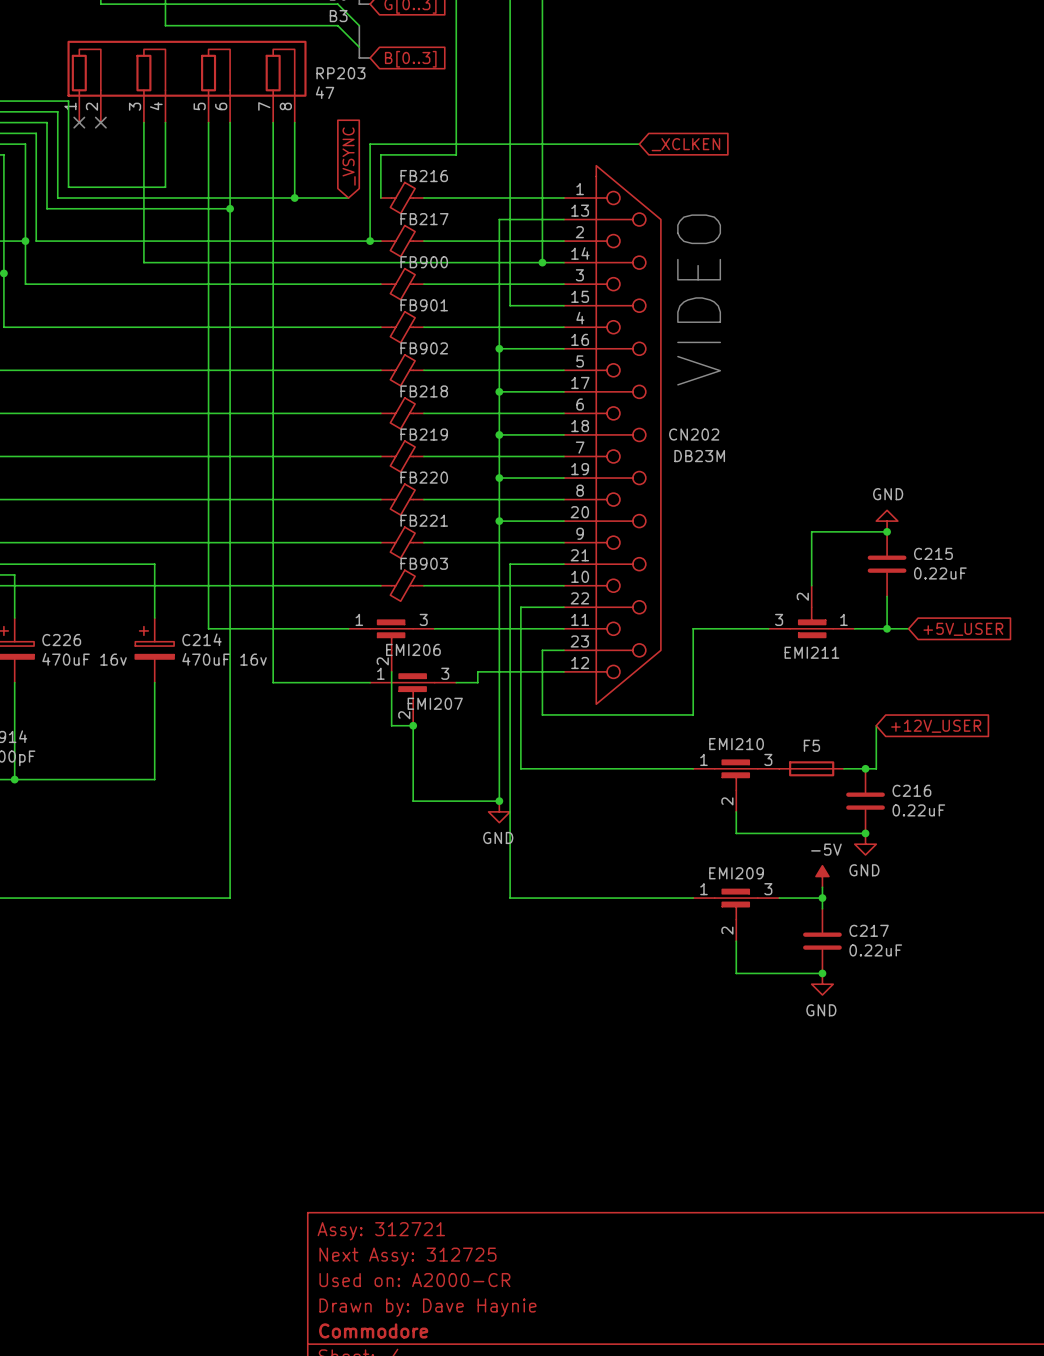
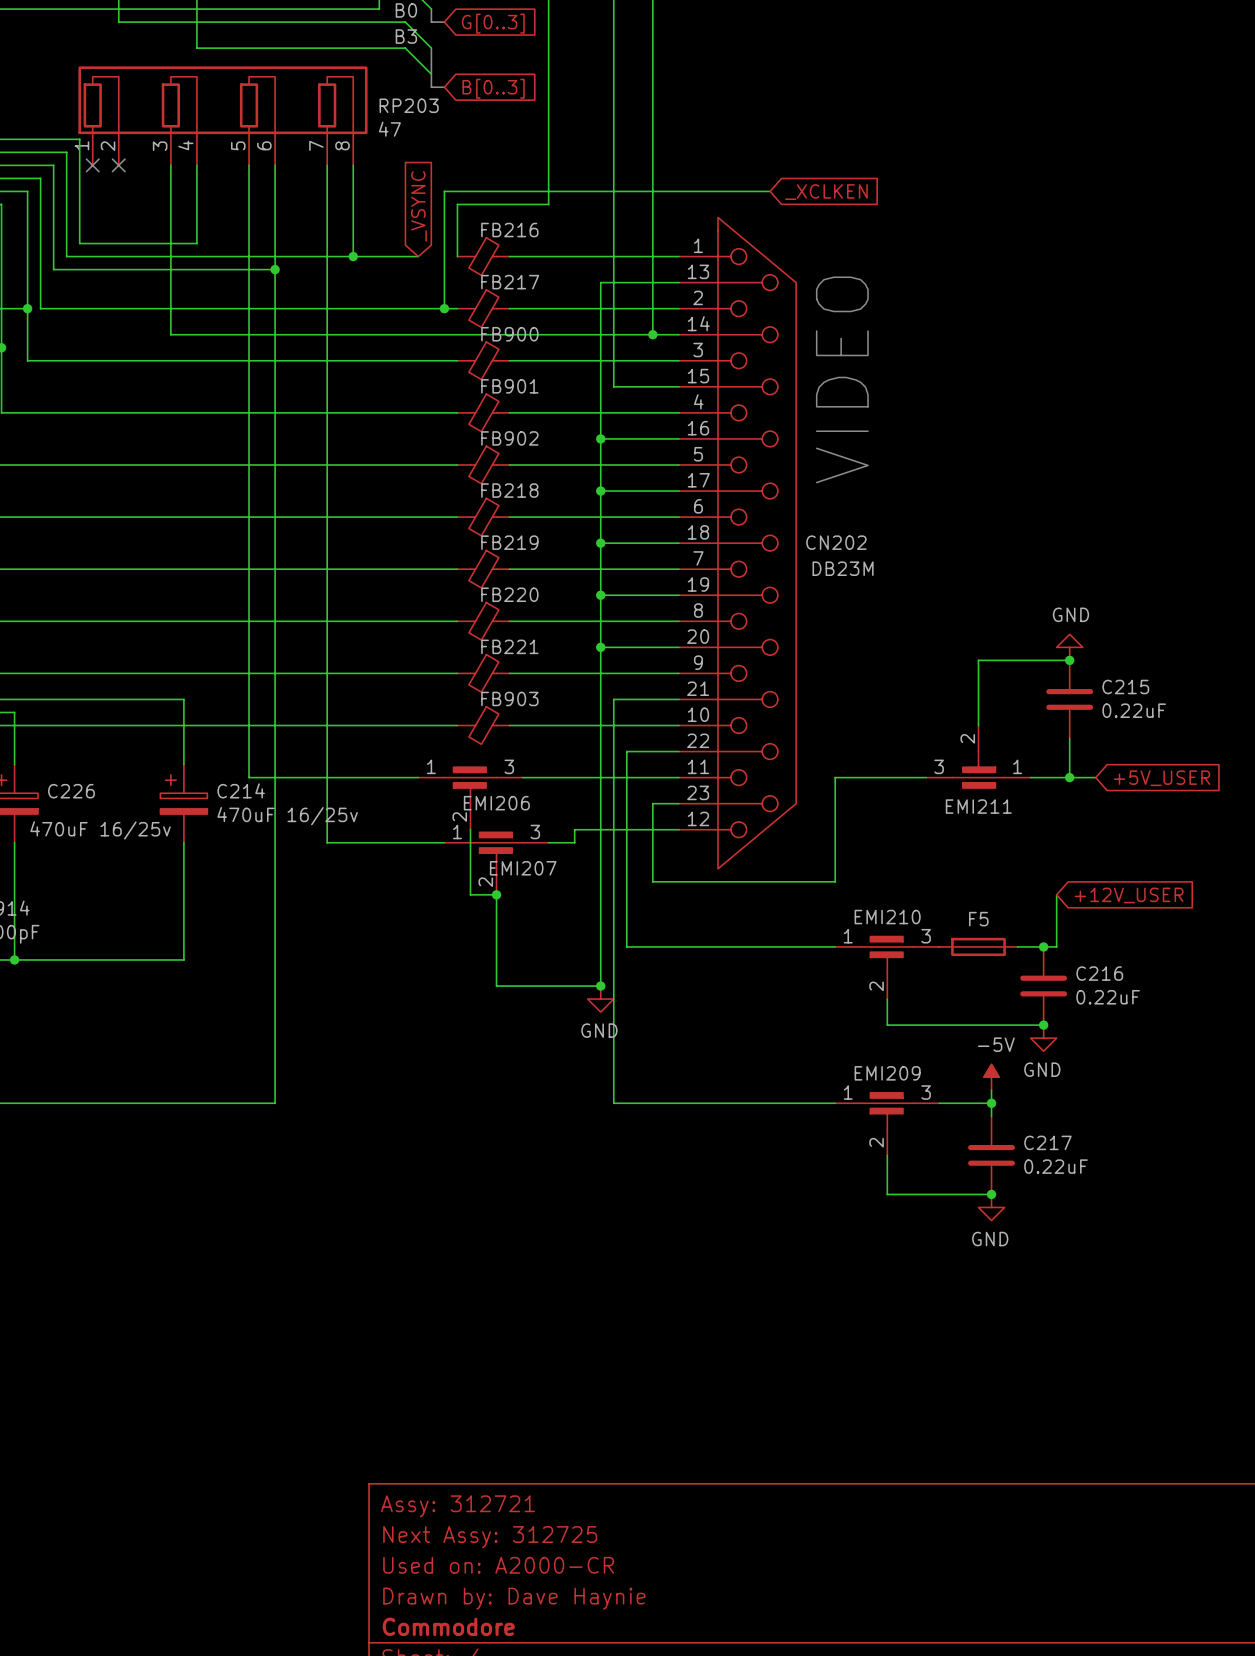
C226 value: 470uF 16v (84, 659) -> 470uF 16/25v (100, 830)
C214 value: 470uF 16v (224, 659) -> 470uF 16/25v (287, 816)

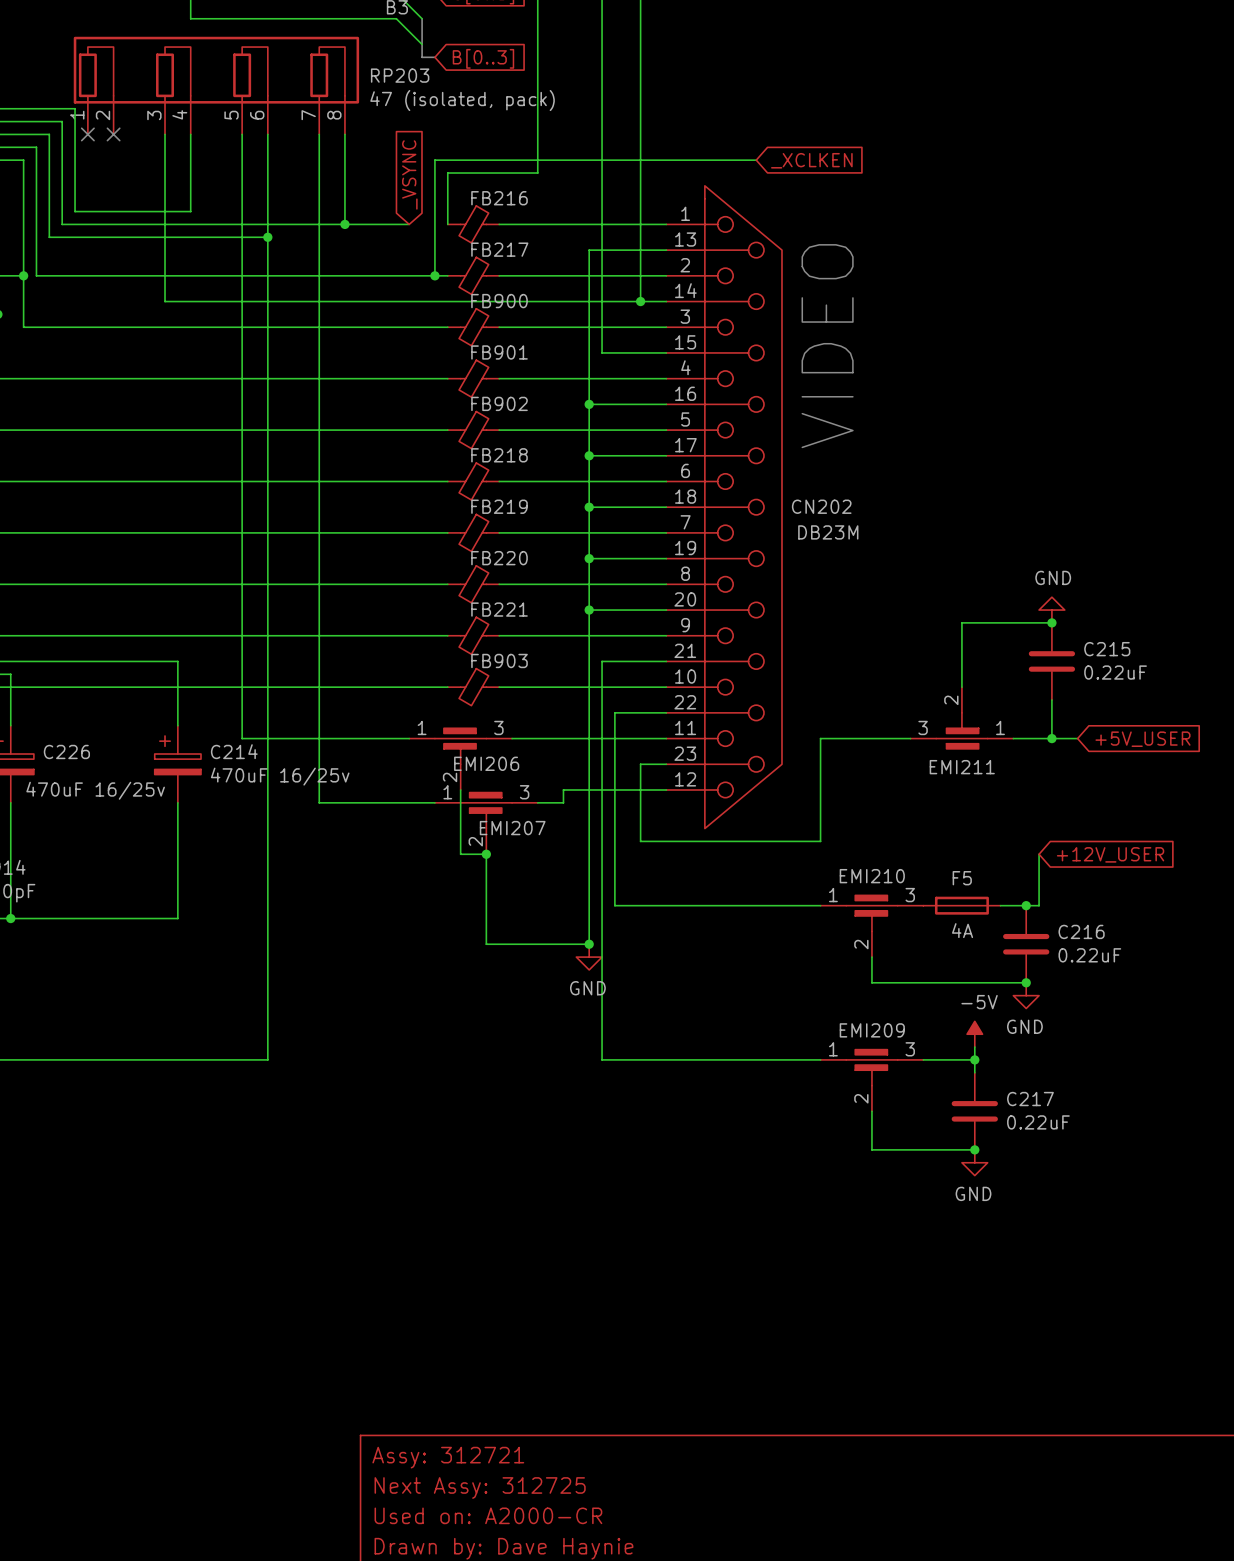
RP203 value: 47 (389, 129) -> 47 (isolated, pack) (462, 100)
F5 value: none -> 4A (962, 930)

